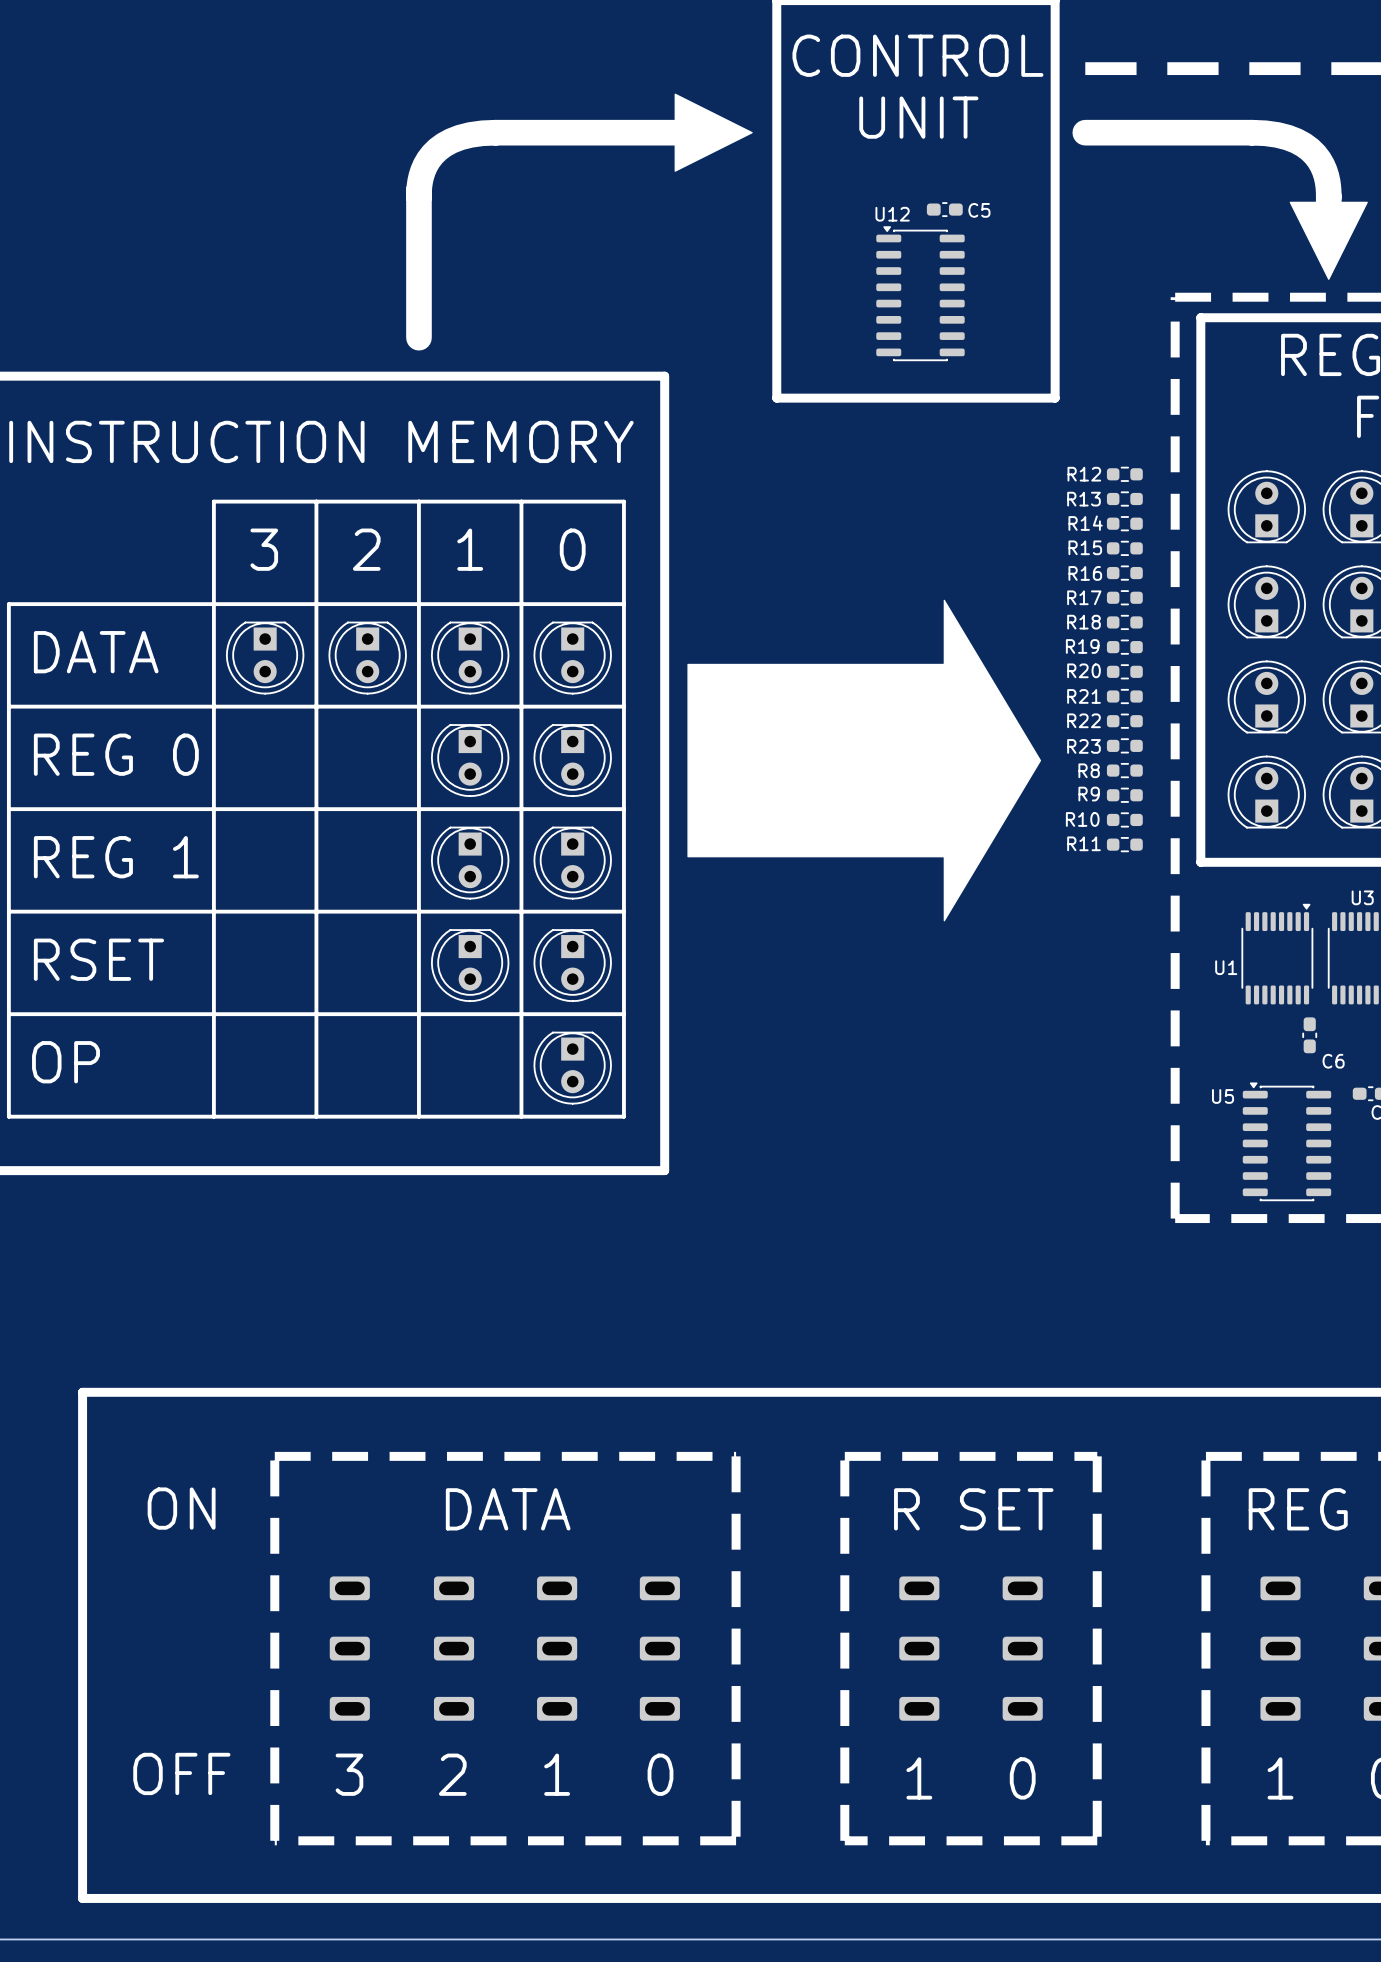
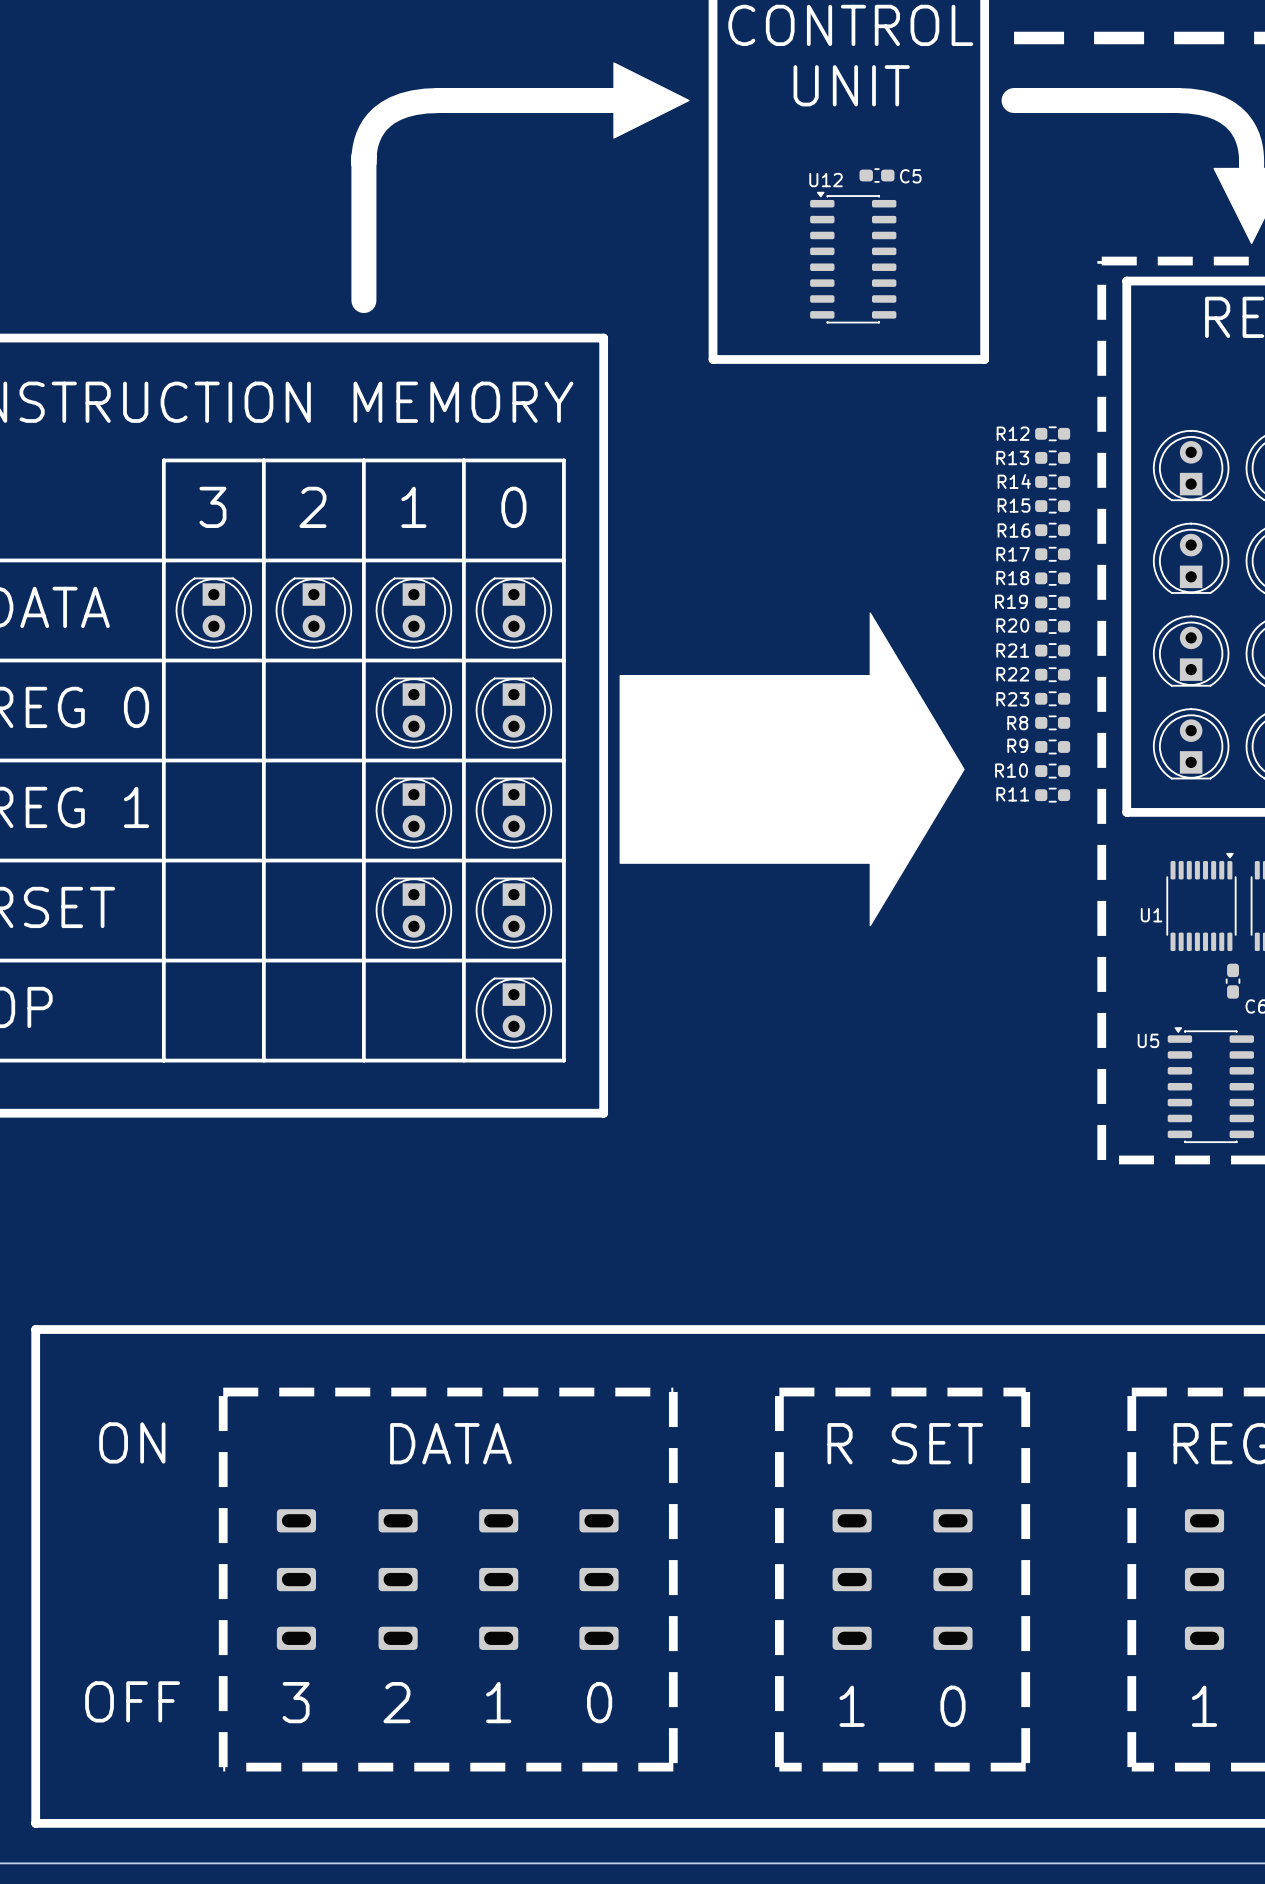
drawing position: (816, 760) -> (745, 769)
drawing position: (992, 760) -> (917, 769)

